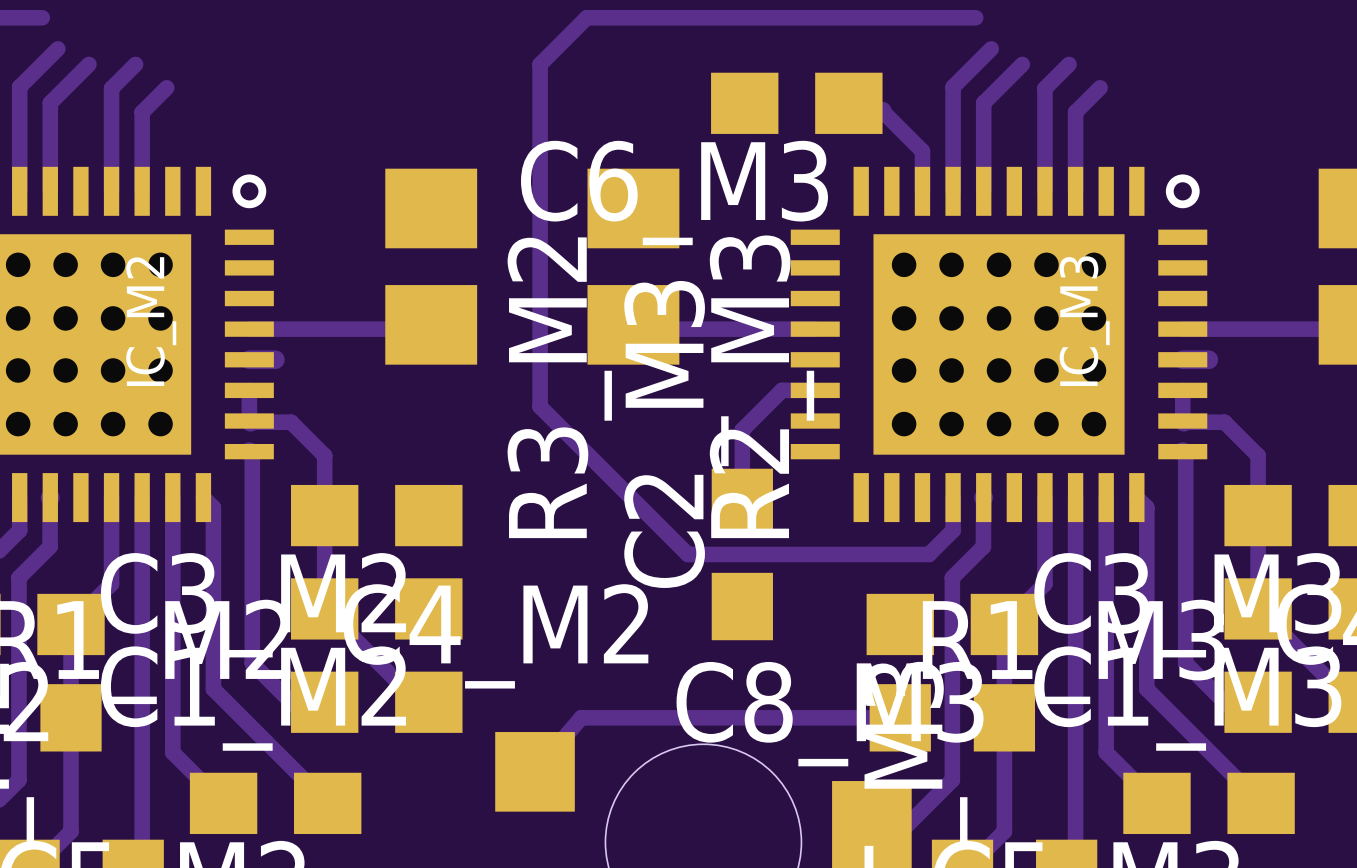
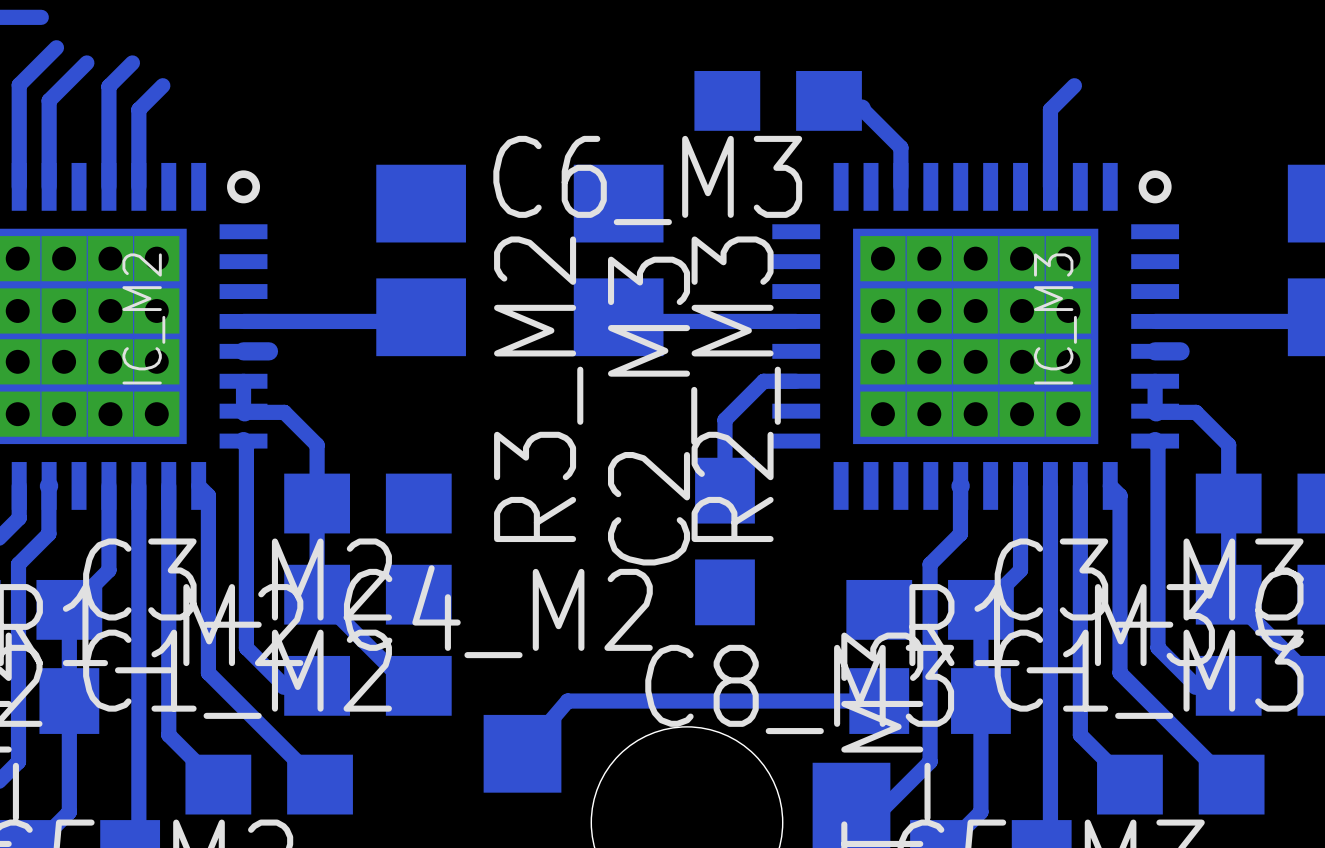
track: (975, 17) (586, 17) (540, 64) (540, 406) (687, 554) (929, 554) (953, 530) (953, 497) -> none
track: (991, 48) (953, 87) (953, 191) -> none
track: (1022, 64) (983, 103) (983, 191) -> none
track: (1069, 64) (1044, 88) (1044, 191) -> none

